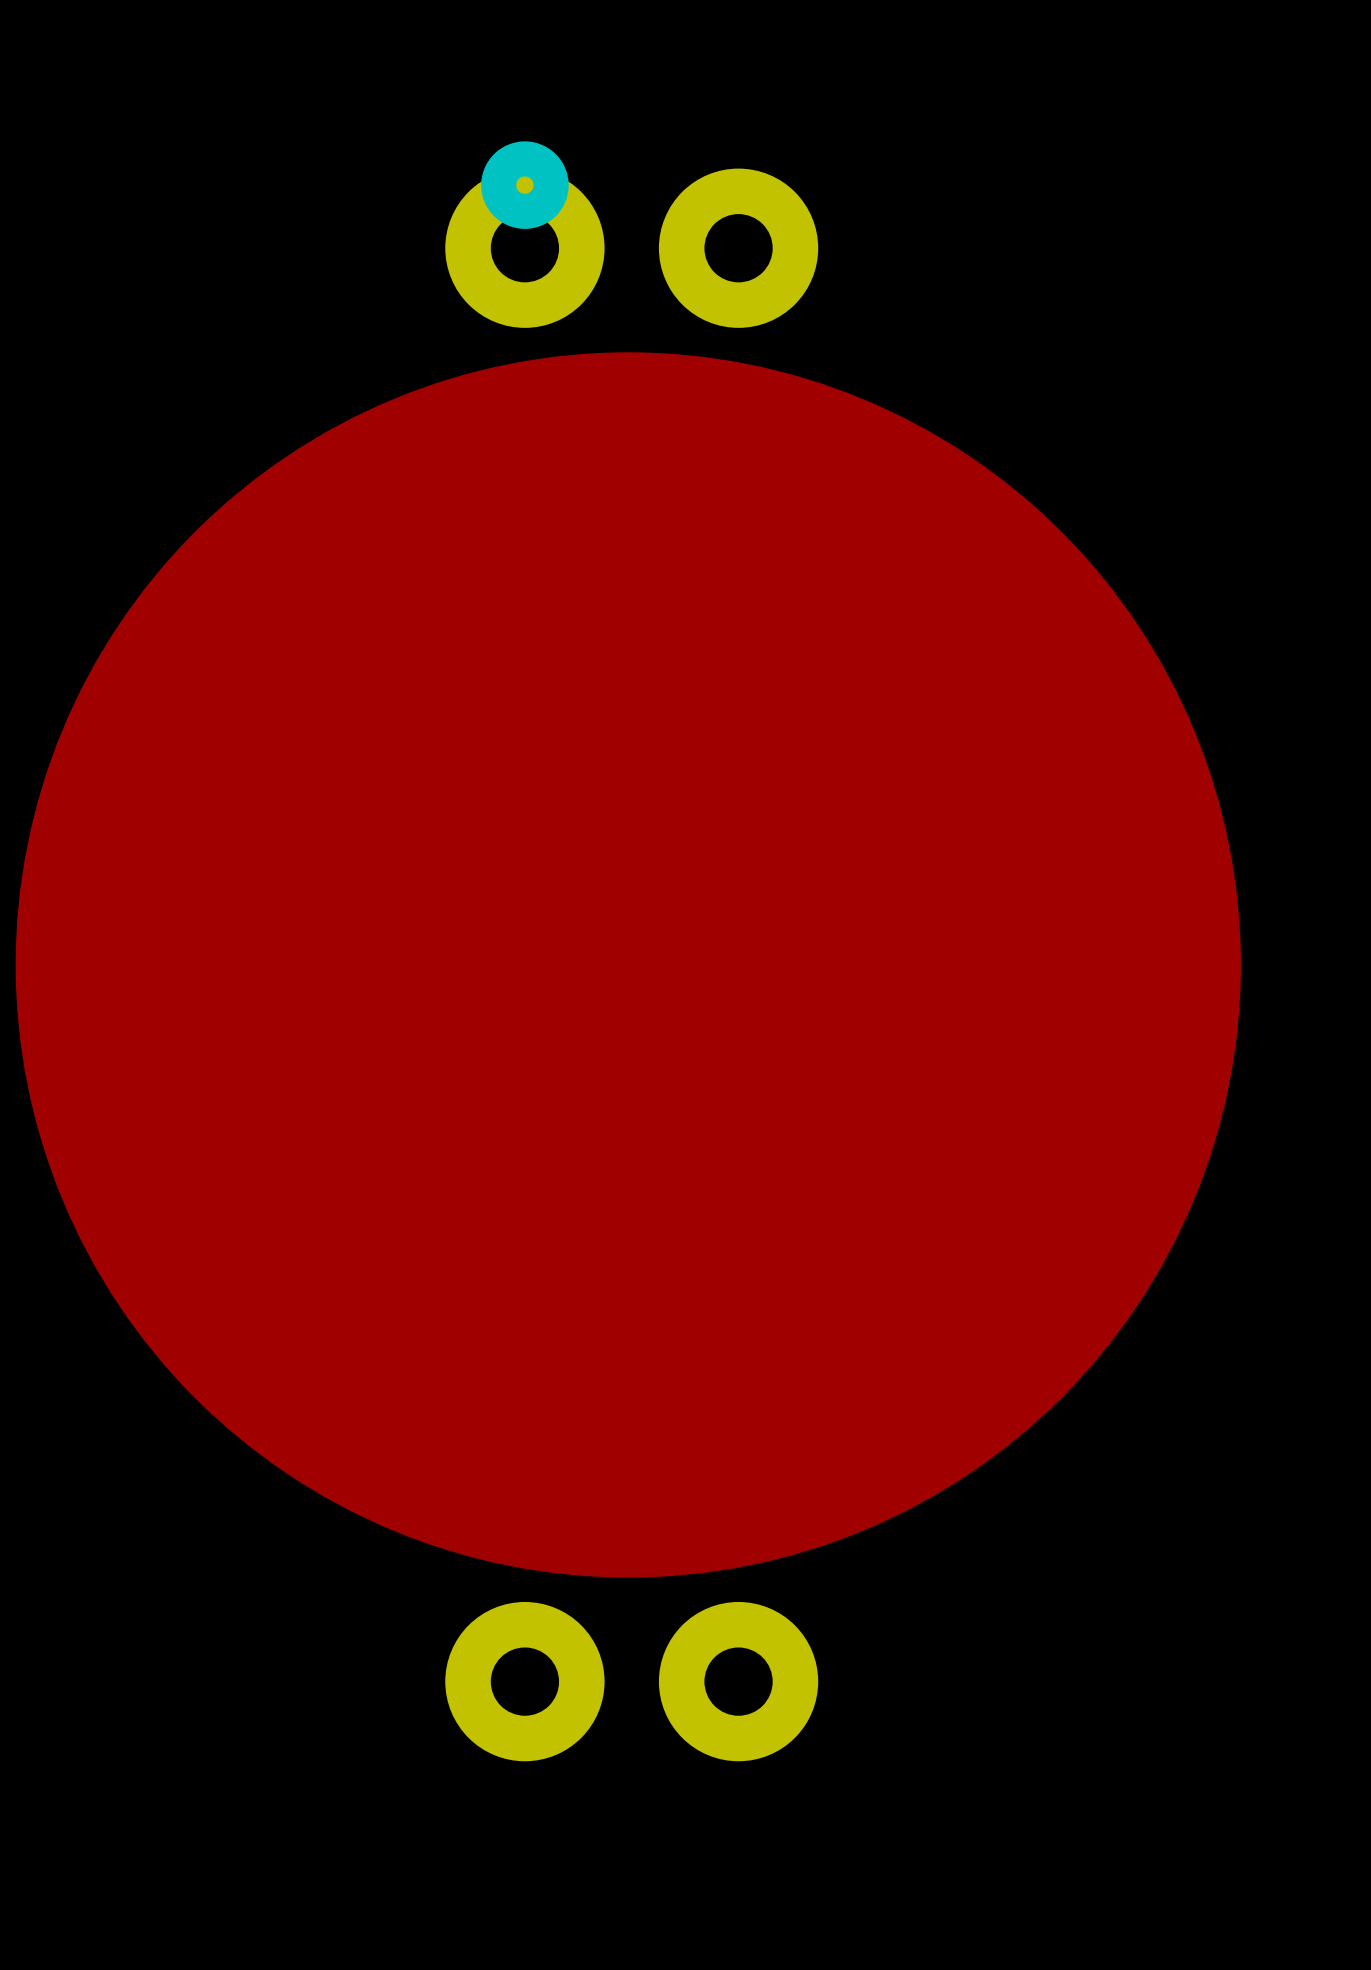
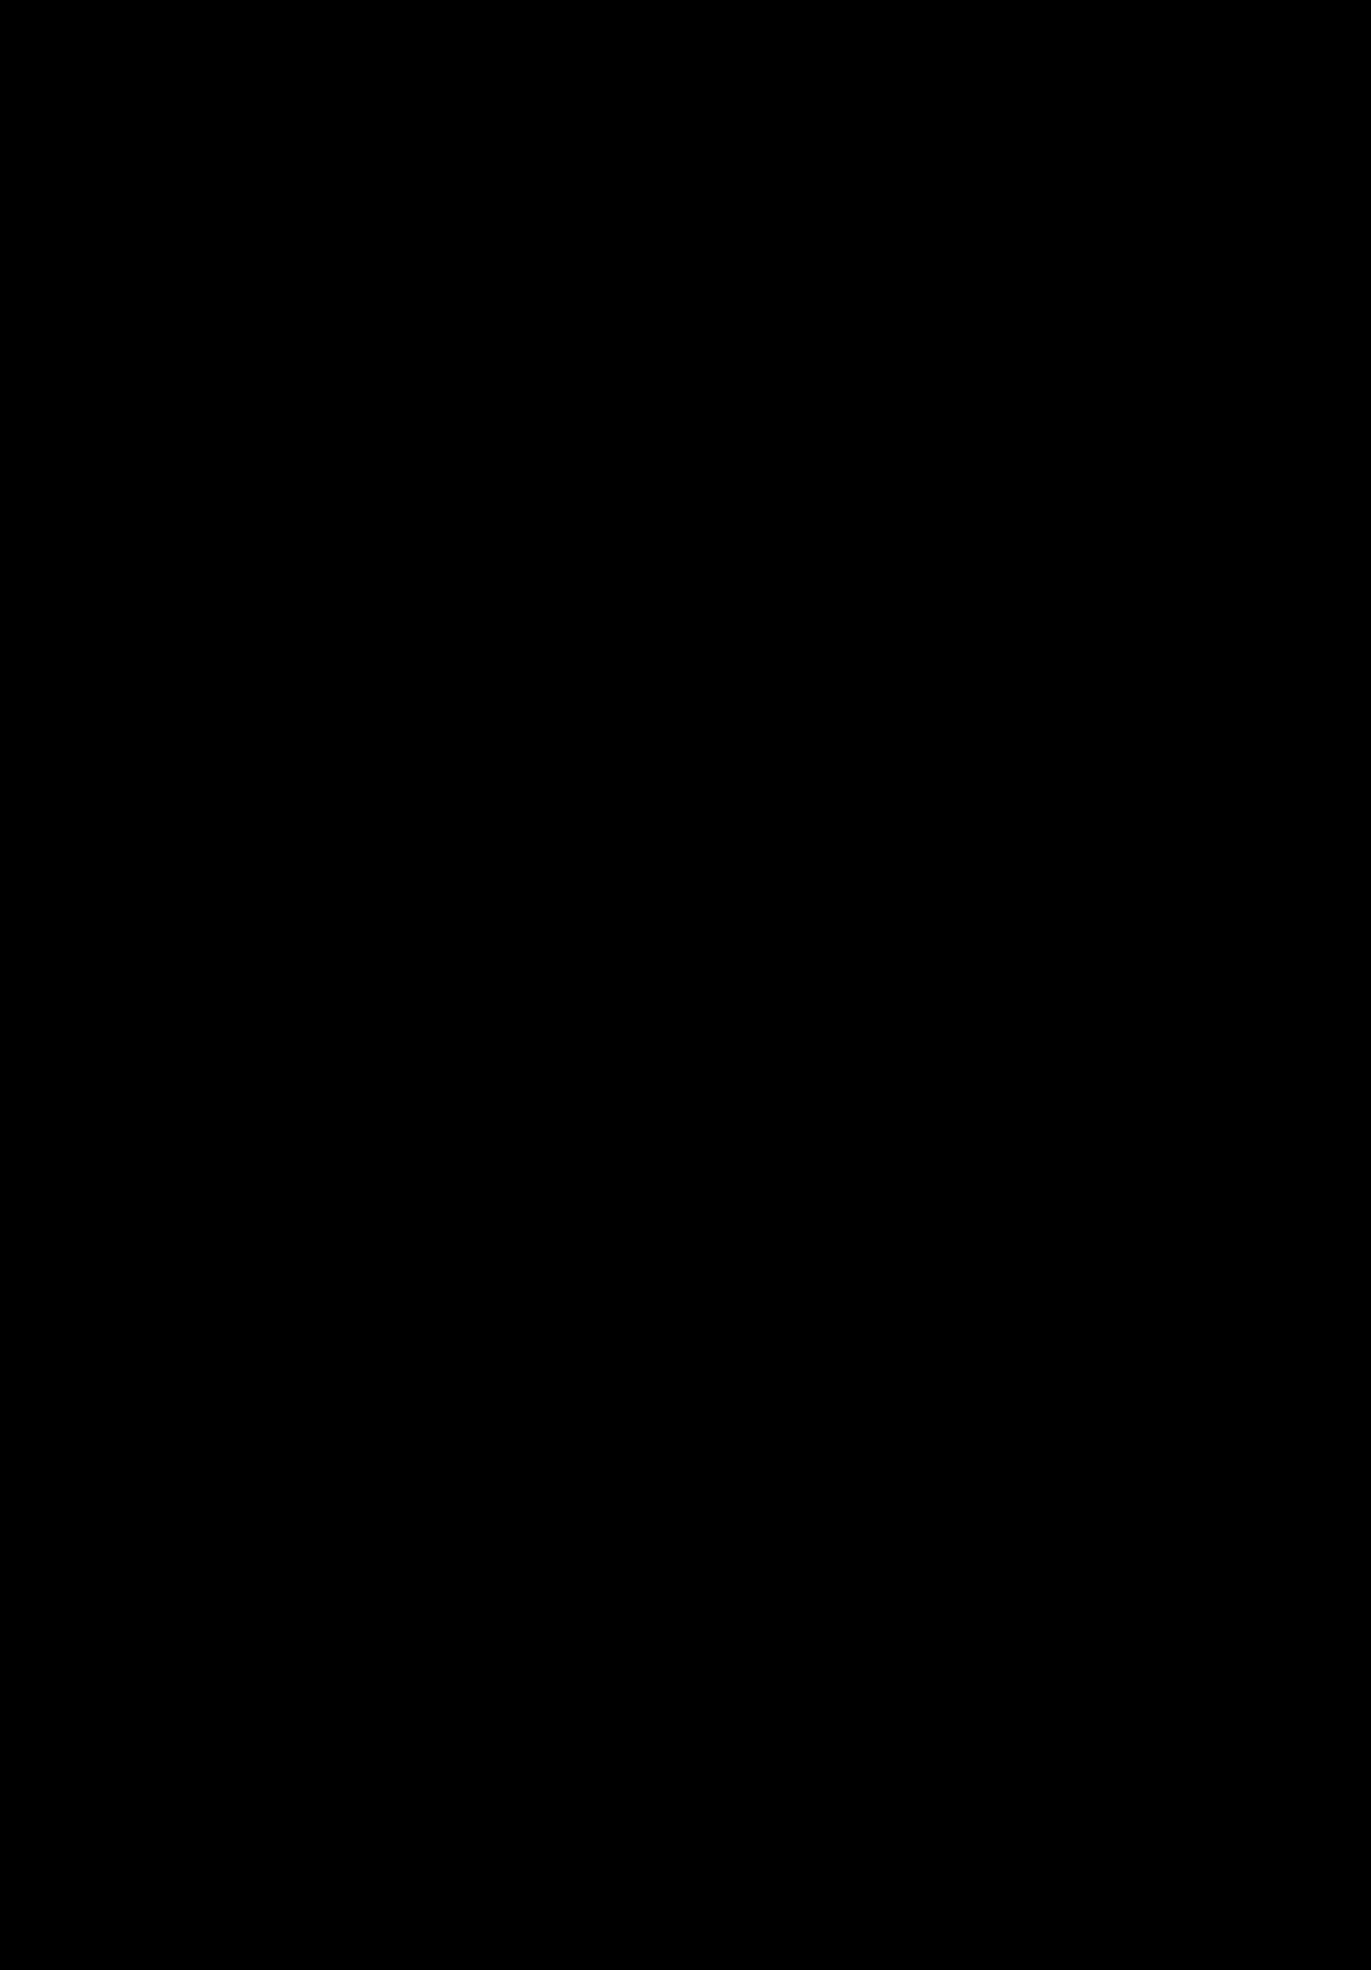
part: (628, 951) -> none

